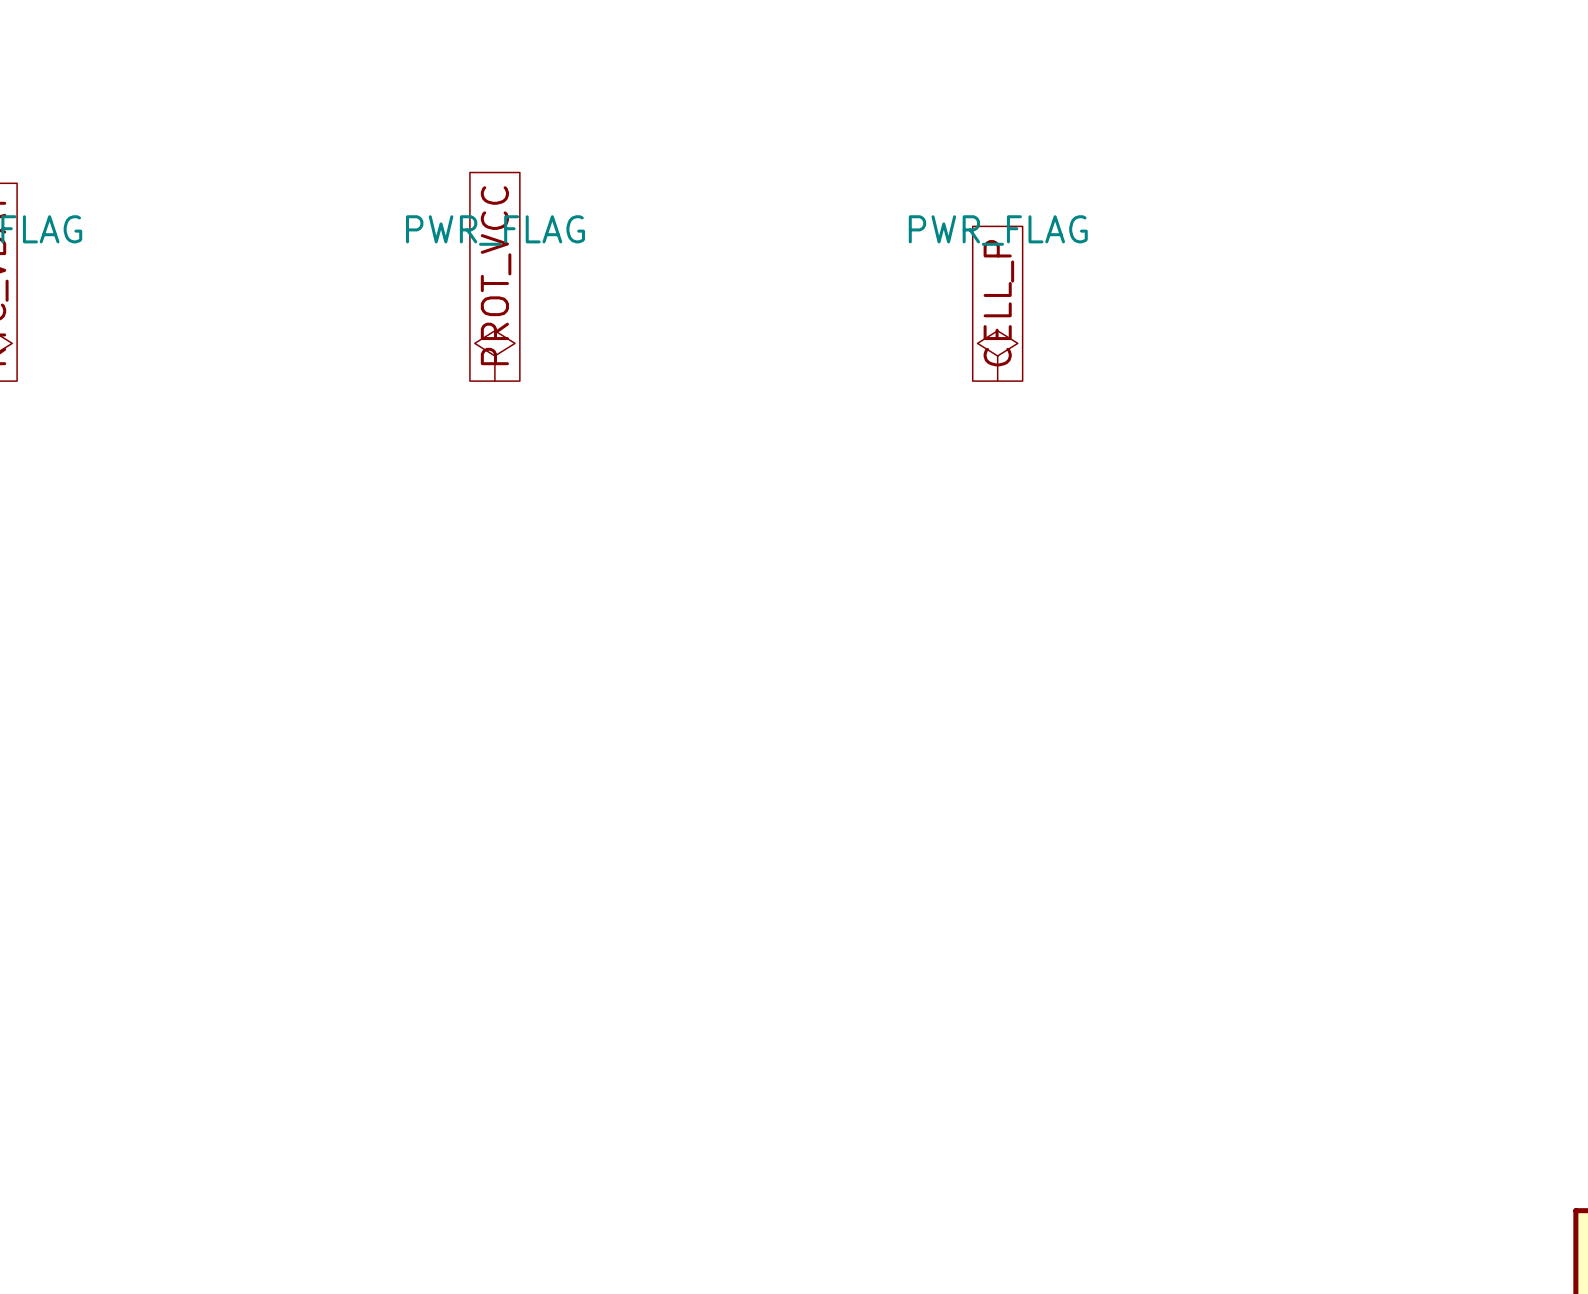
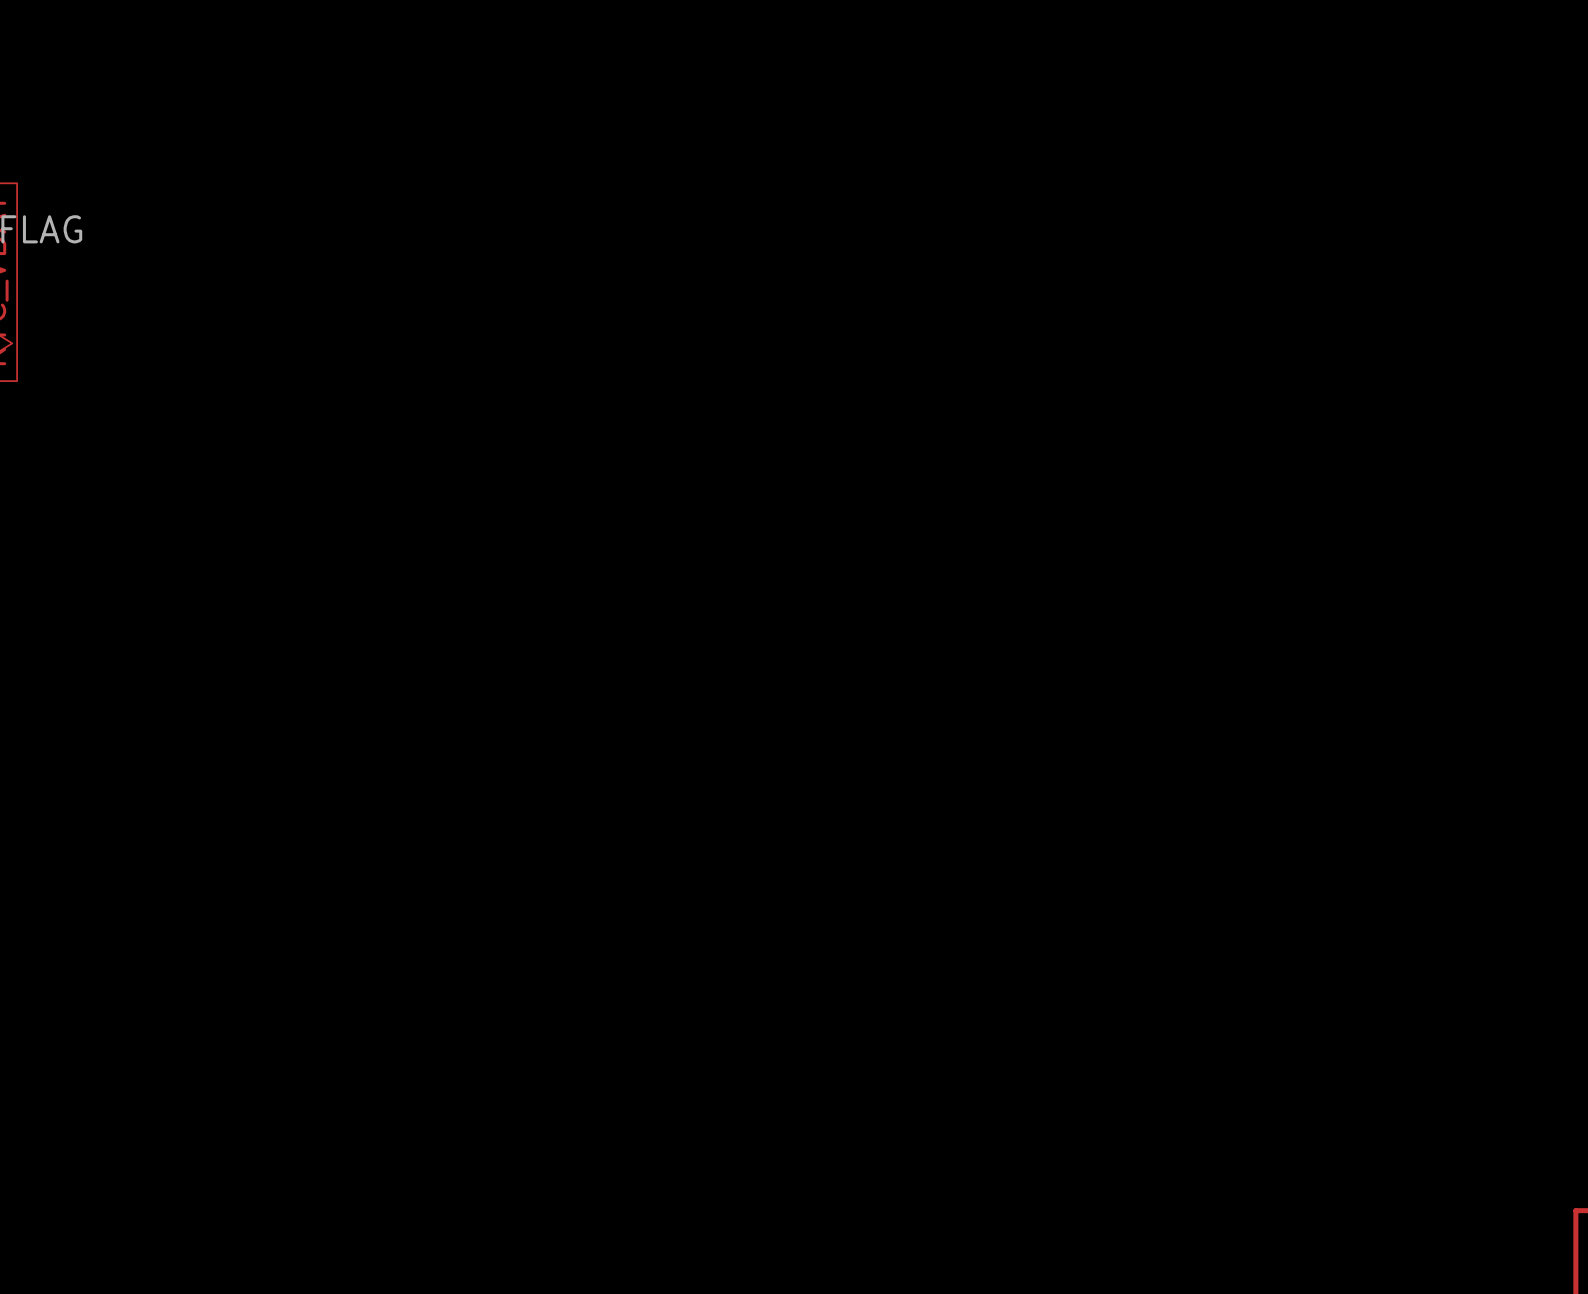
global label: PROT_VCC (496, 275) -> none
global label: CELL_P (998, 303) -> none
power symbol: PWR_FLAG (494, 355) -> none
power symbol: PWR_FLAG (997, 355) -> none

